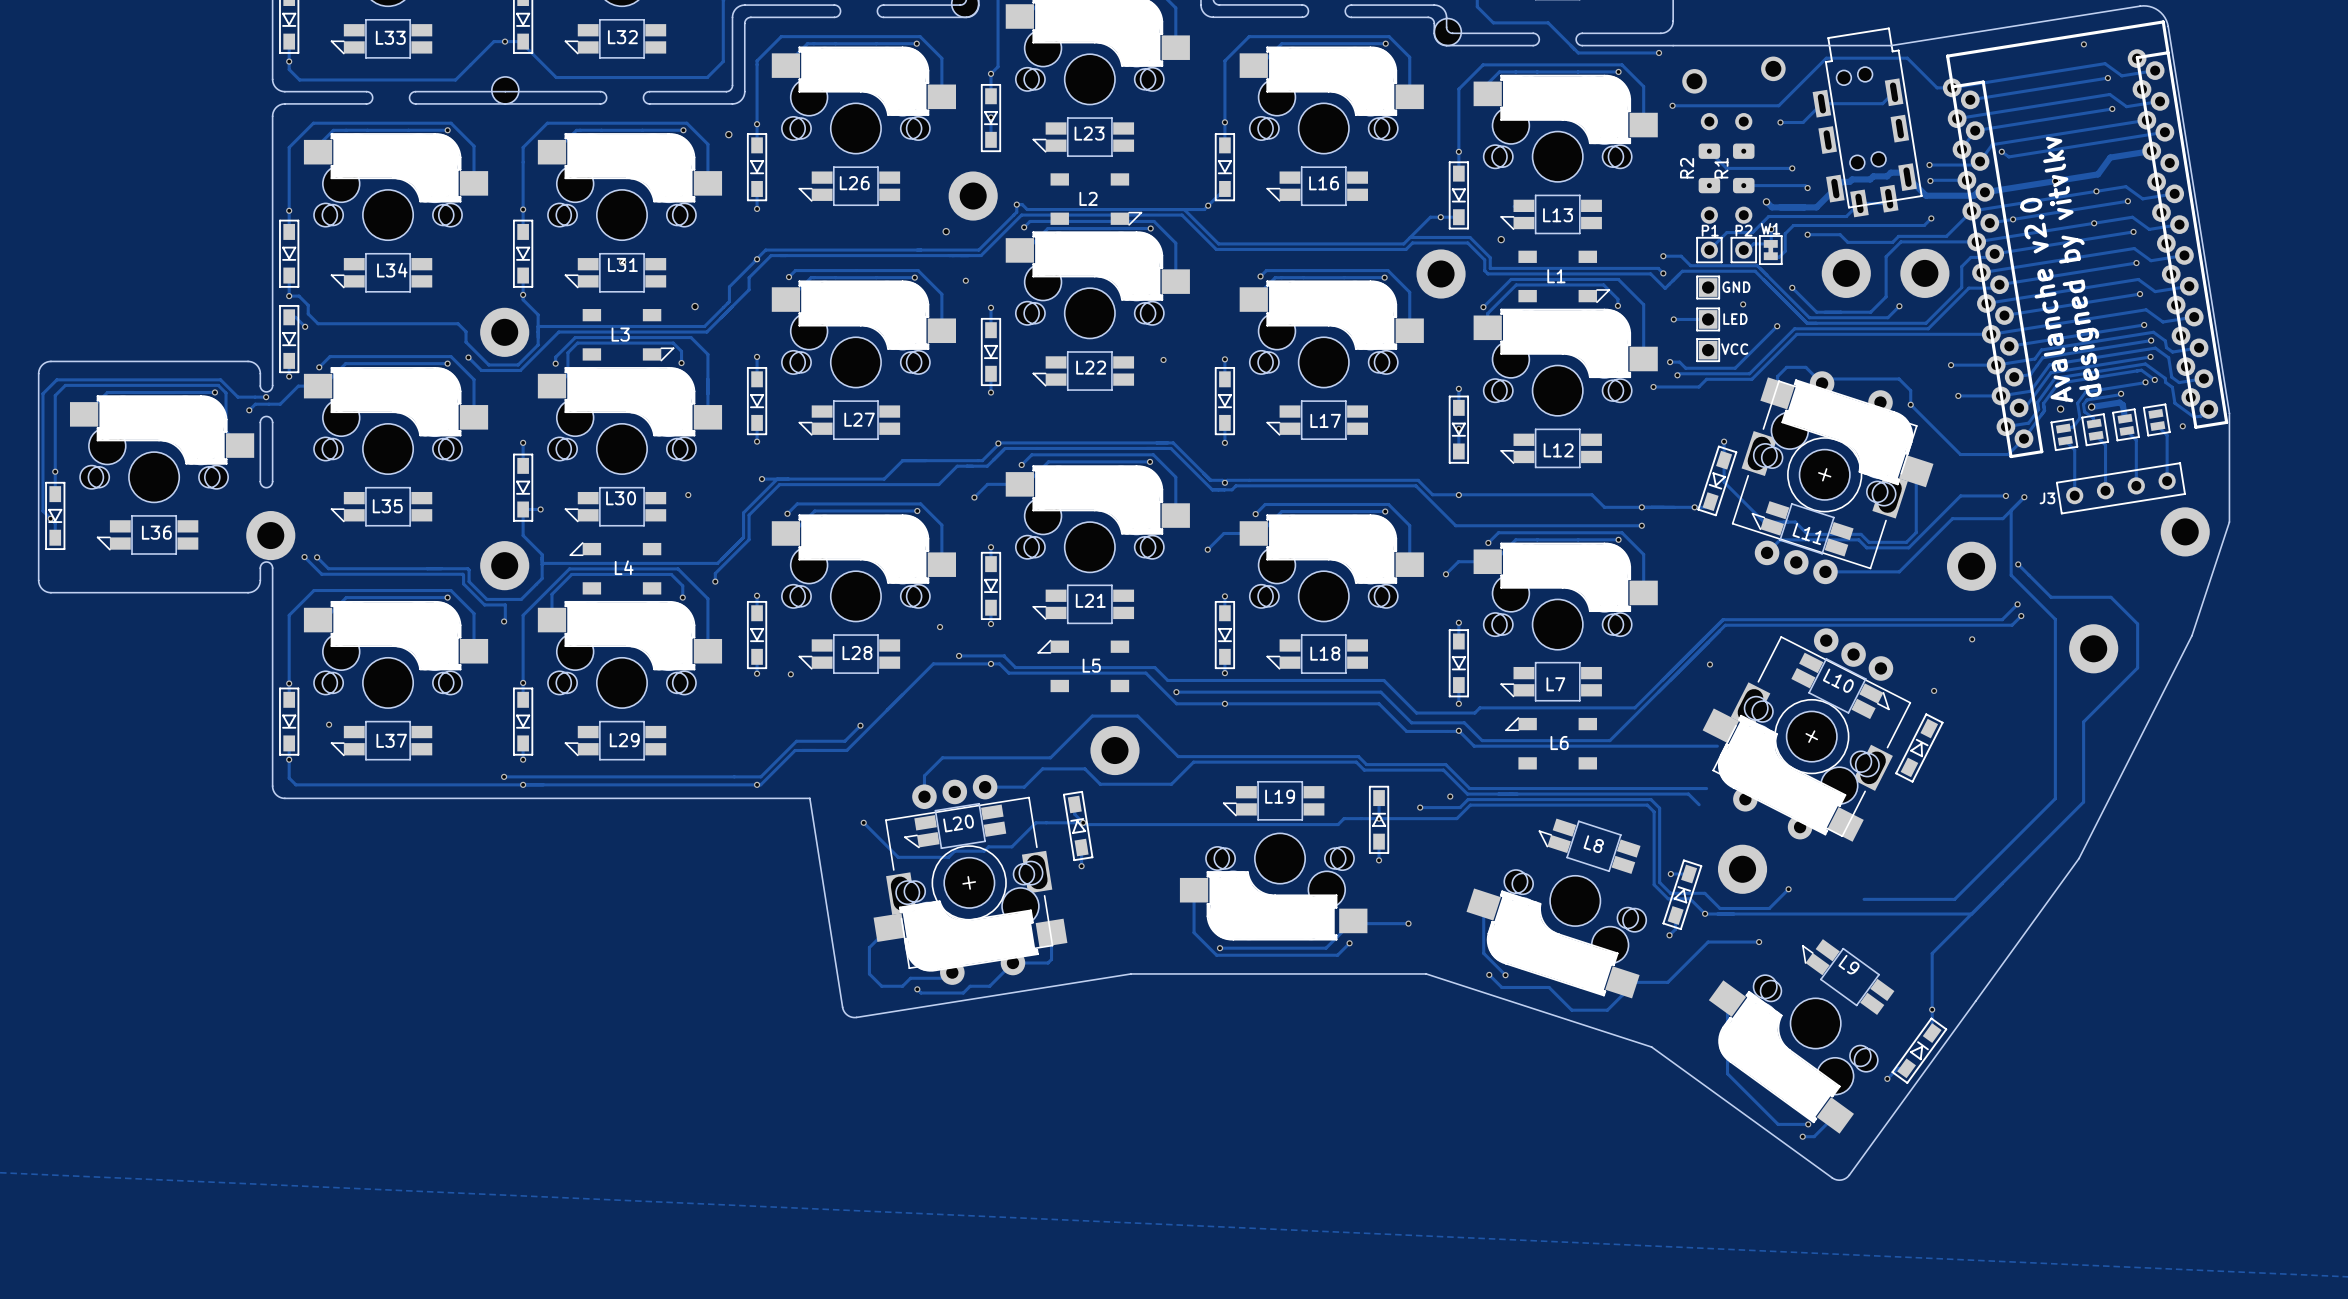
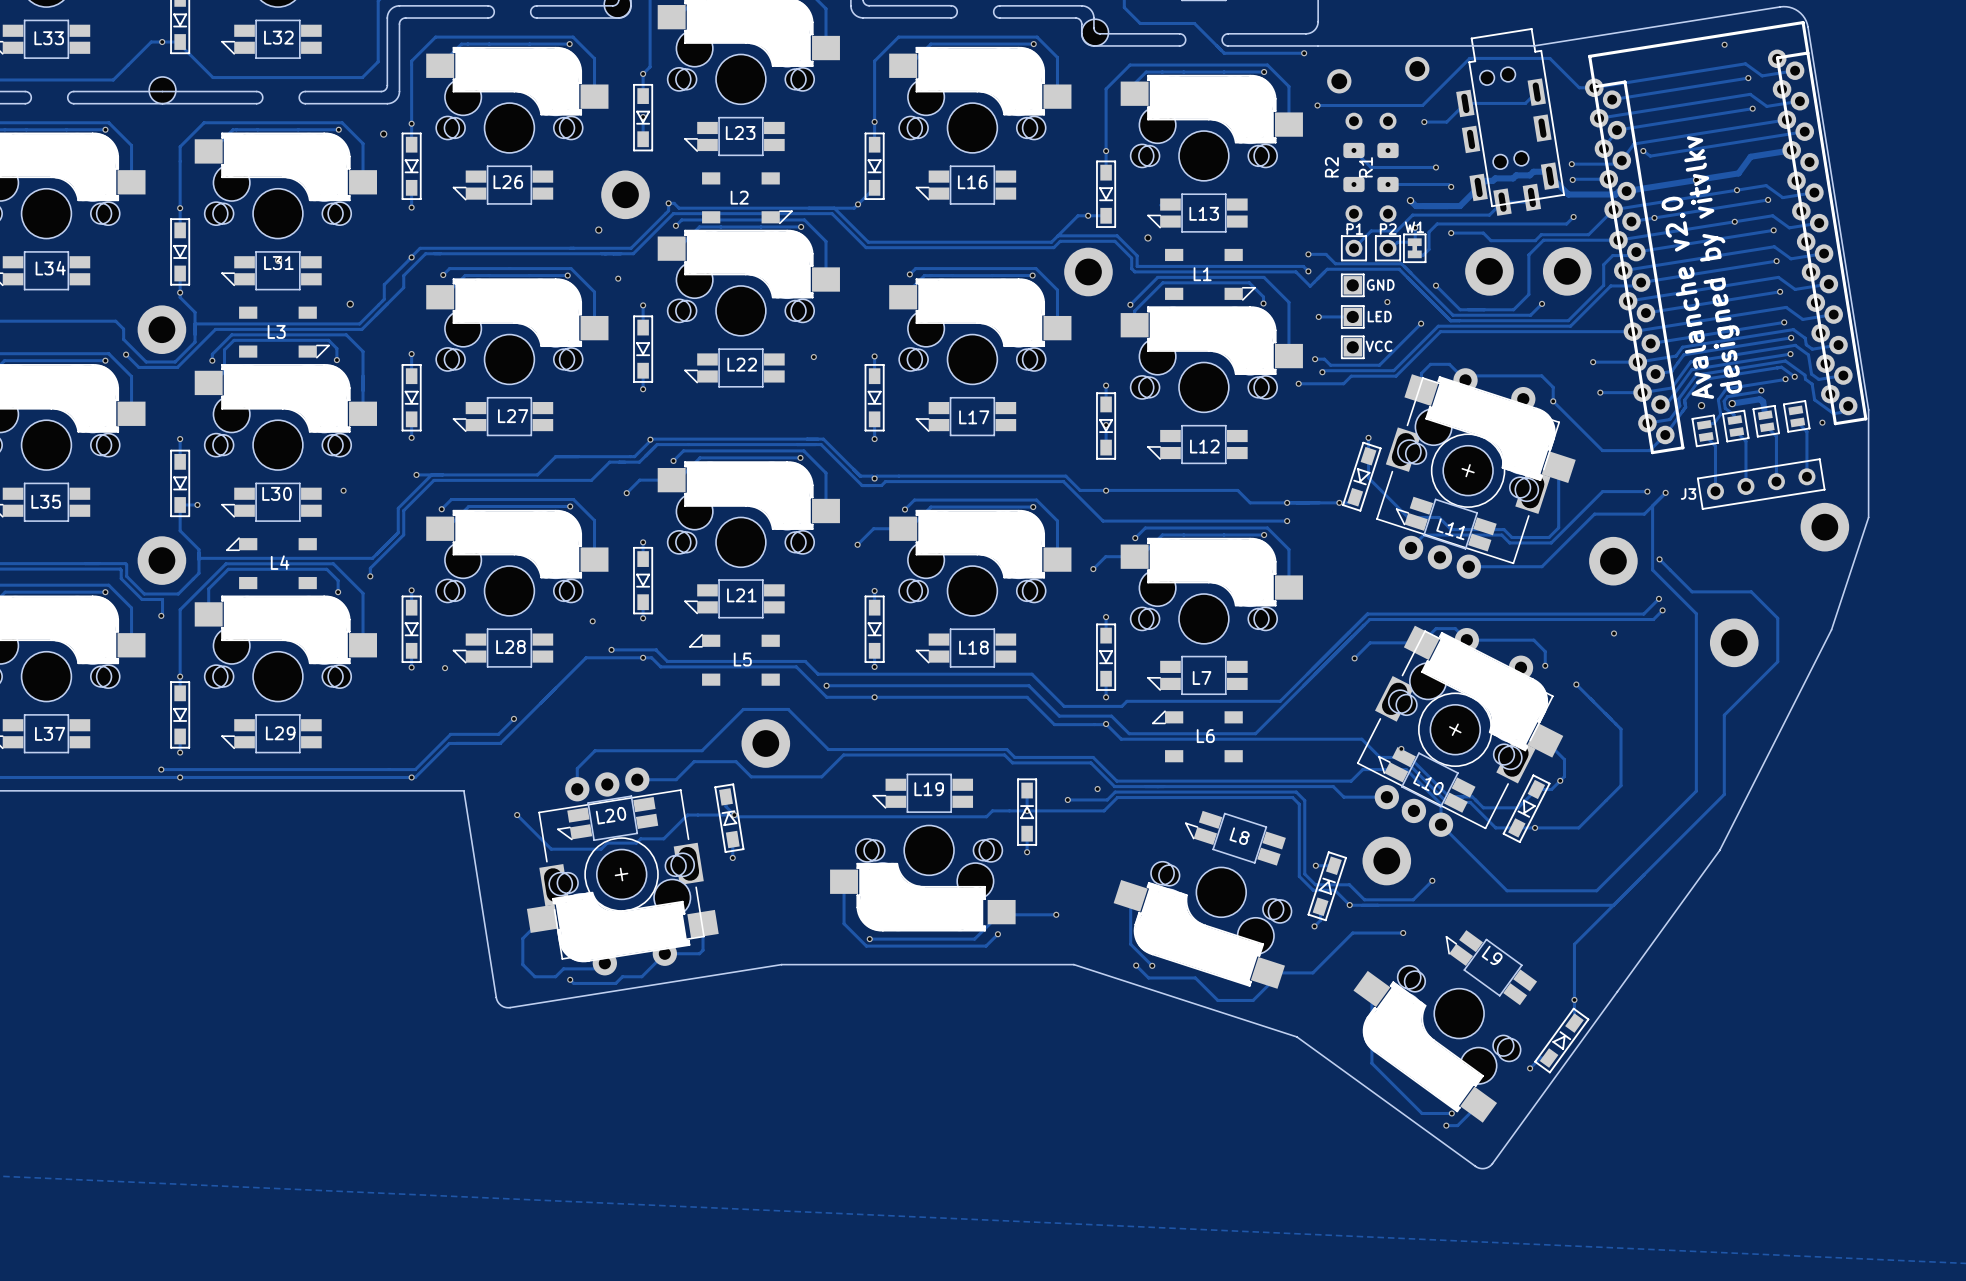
track: none -> (1354, 658) (1370, 642) (1421, 642) (1436, 628) (1455, 628) (1466, 640) (1533, 640) (1545, 651) (1545, 665)
via: none -> (1545, 665)
L10 rotation: 0° (1840, 685) -> 180° (1426, 779)
L10 position: (1840, 685) -> (1426, 779)
track: none -> (1576, 684) (1621, 729) (1621, 785) (1578, 827) (1495, 827) (1470, 802) (1446, 802) (1401, 757) (1380, 757) (1361, 739)
part rotation: 0° (1811, 733) -> 180° (1455, 732)
track: none -> (1545, 740) (1564, 759) (1564, 776) (1551, 789) (1536, 789) (1518, 807) (1483, 807) (1472, 796) (1449, 796) (1401, 749)
part rotation: 0° (1919, 748) -> 180° (1526, 808)
part position: (1919, 748) -> (1526, 808)
via: none -> (1401, 748)
part rotation: 0° (1790, 769) -> 180° (1476, 697)
track: none -> (1351, 781) (1362, 769) (1406, 769) (1440, 804) (1440, 824) (1507, 890)
via: none -> (1560, 780)
track: none -> (1343, 797) (1386, 797)
via: none -> (1535, 827)

